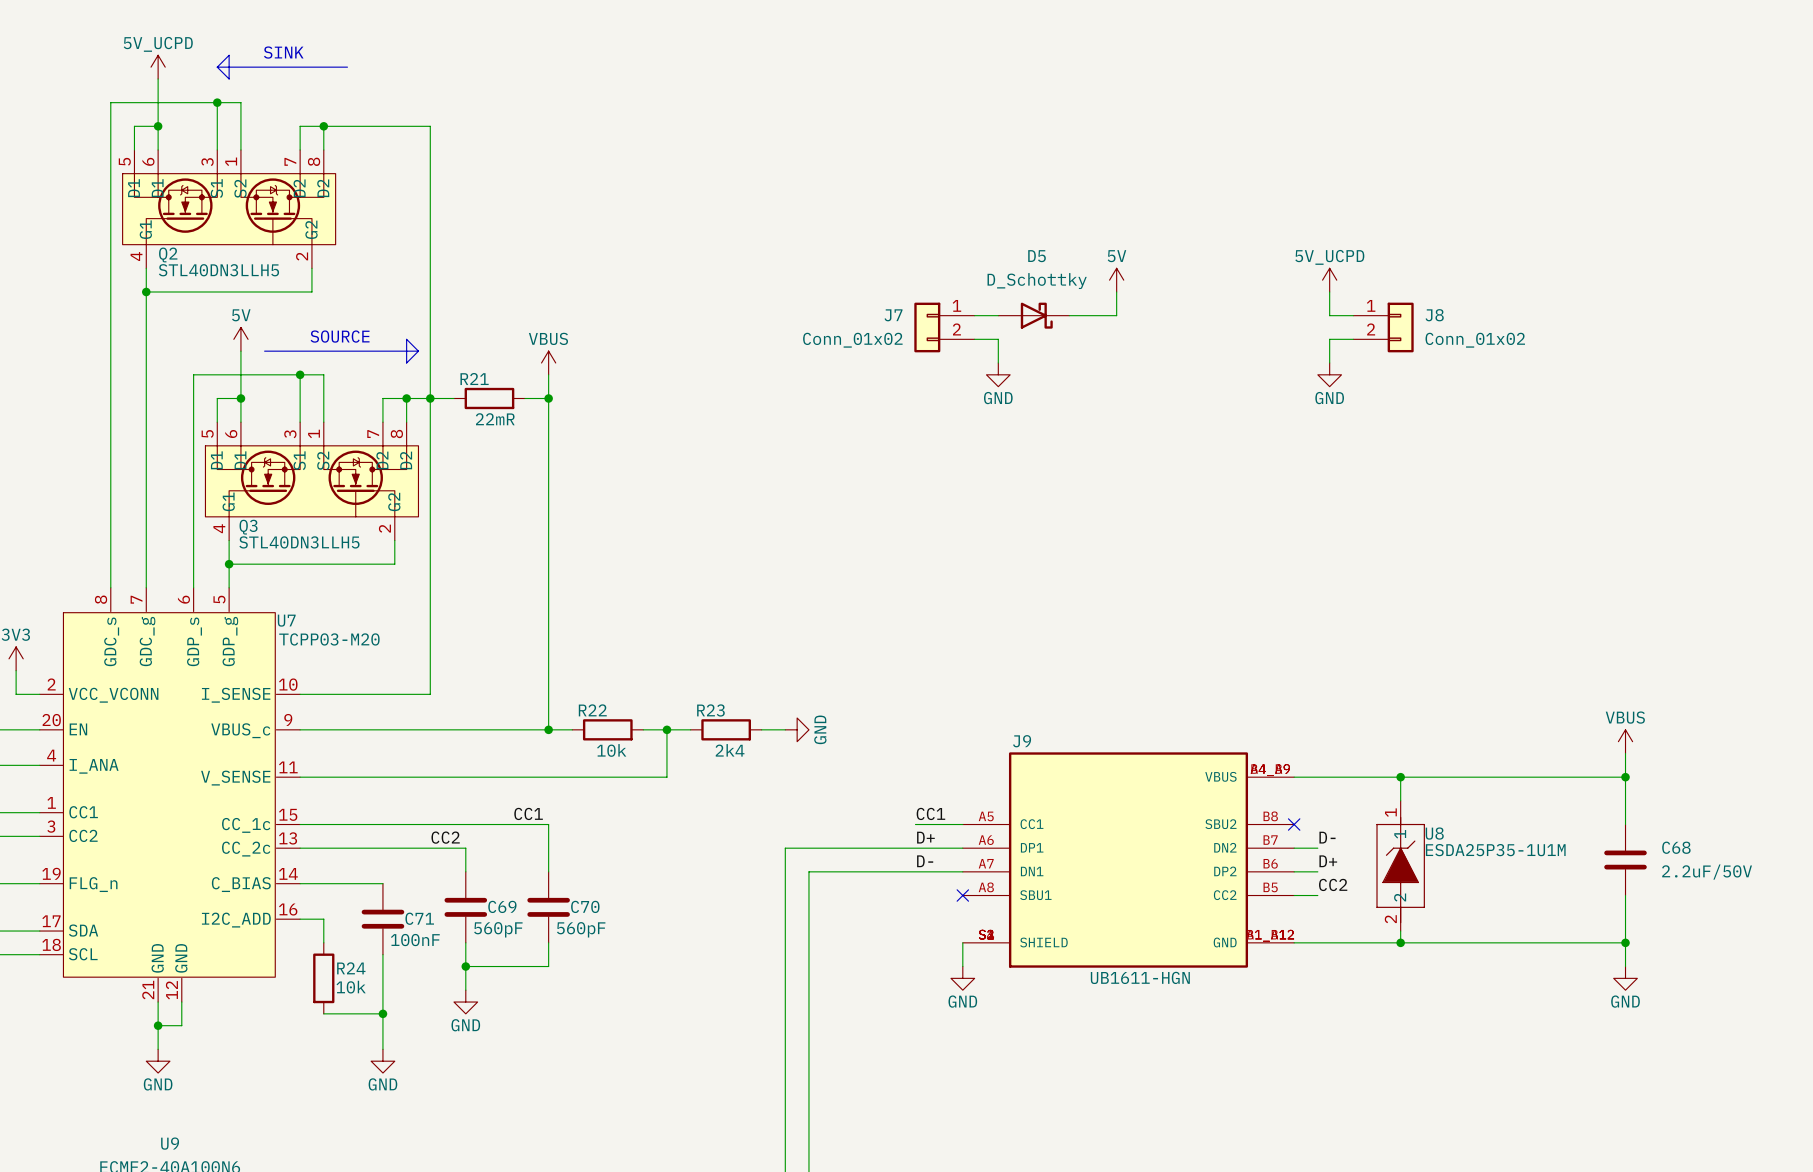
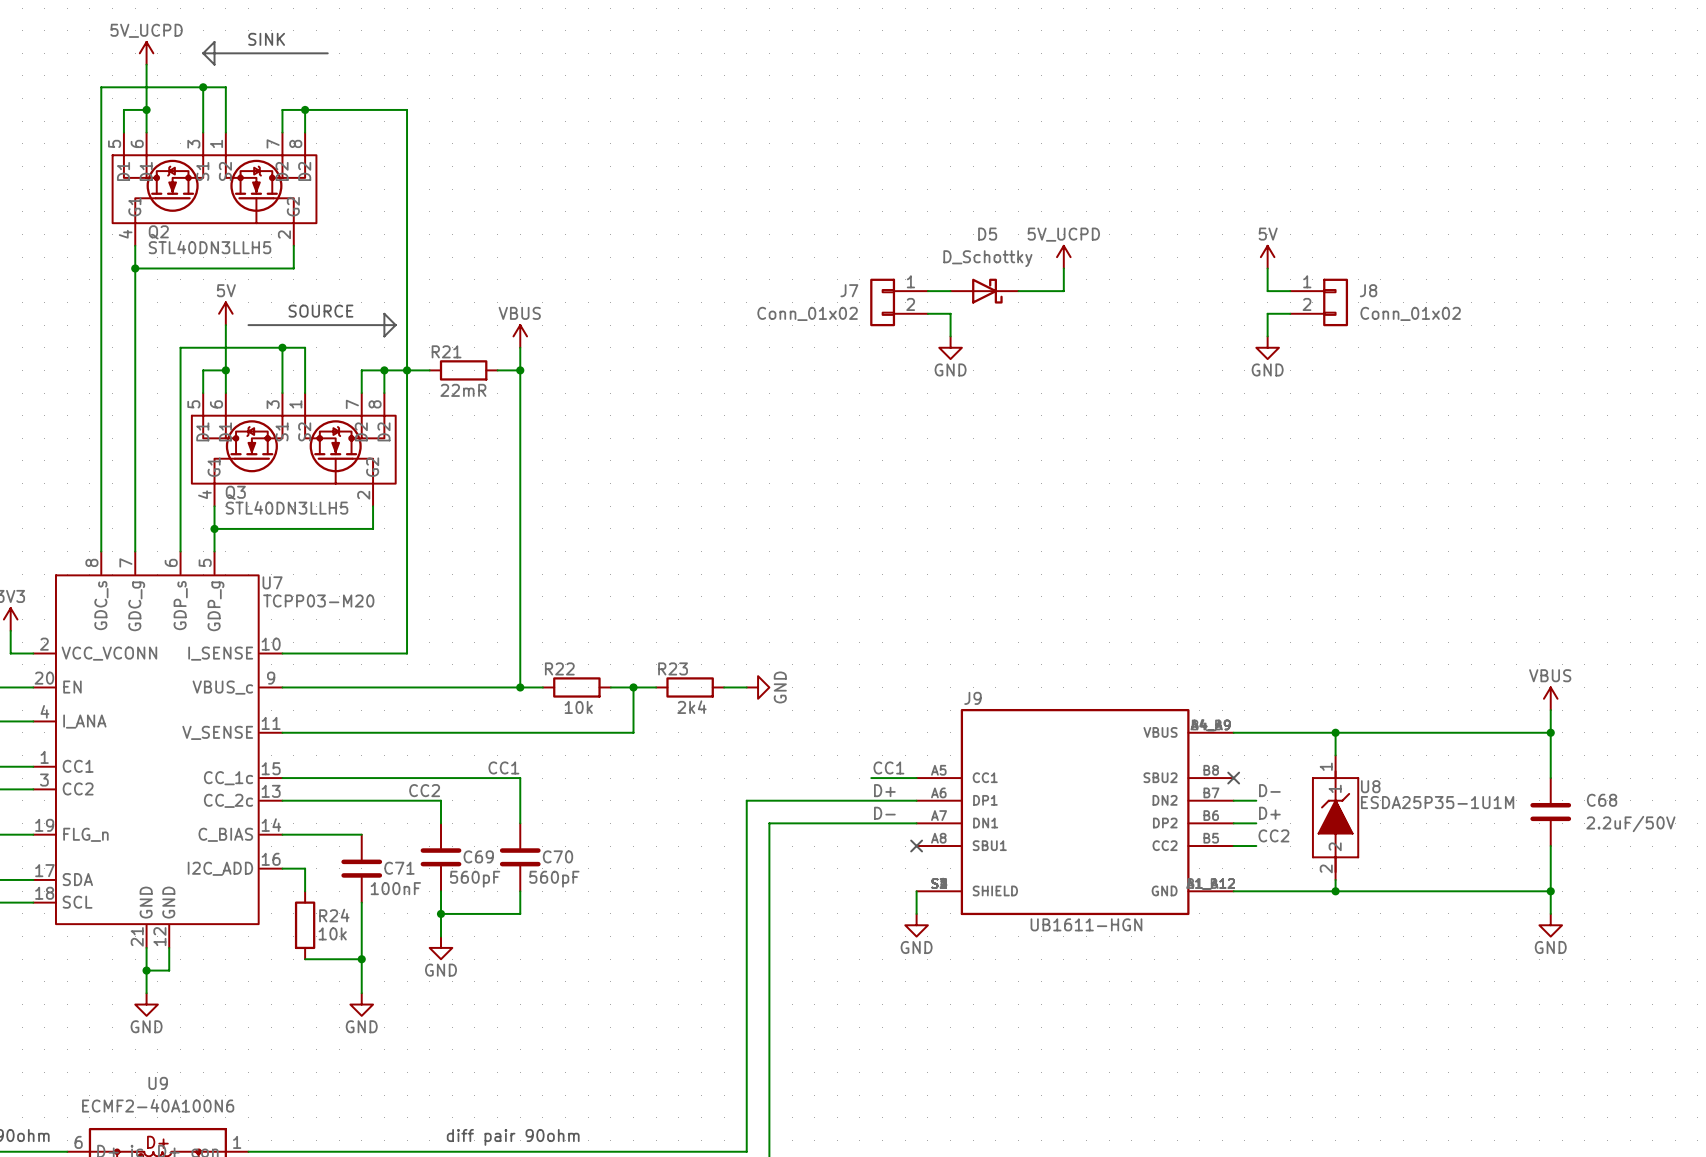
power symbol: 5V (1116, 280) -> 5V_UCPD (1063, 257)
power symbol: 5V_UCPD (1329, 280) -> 5V (1267, 257)

